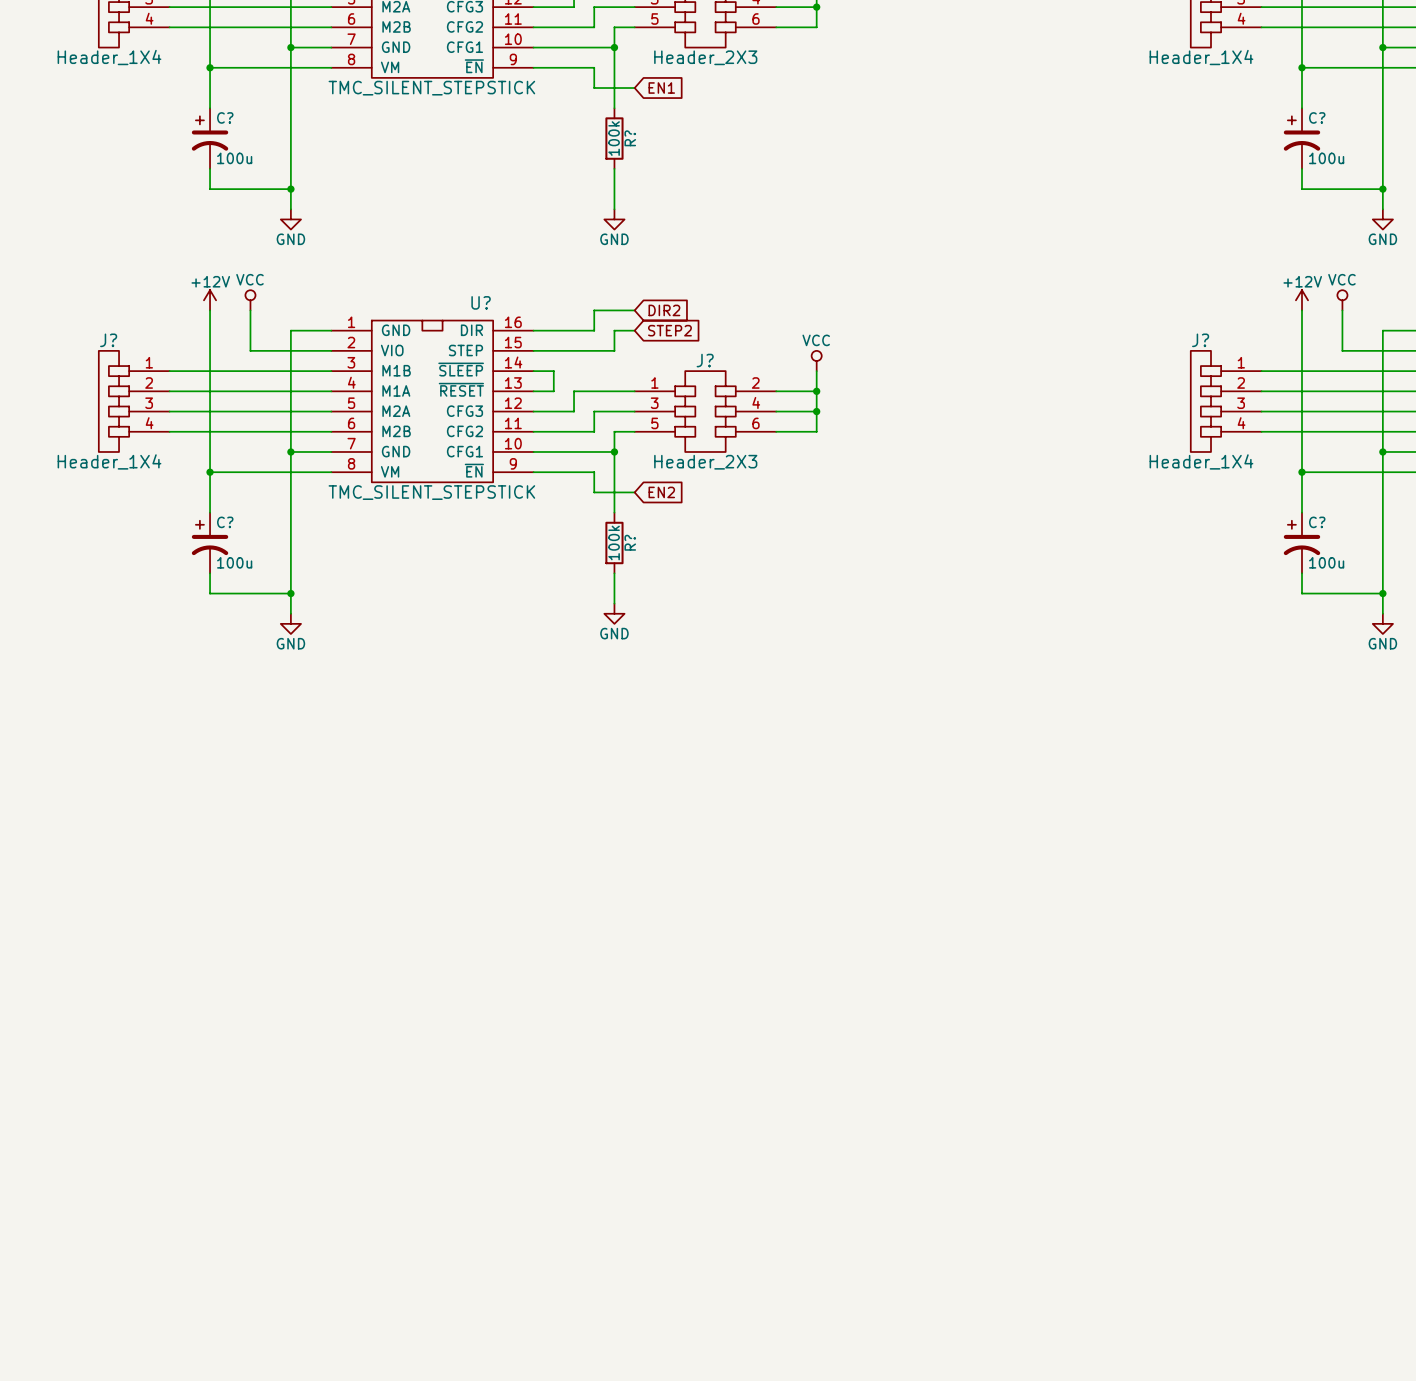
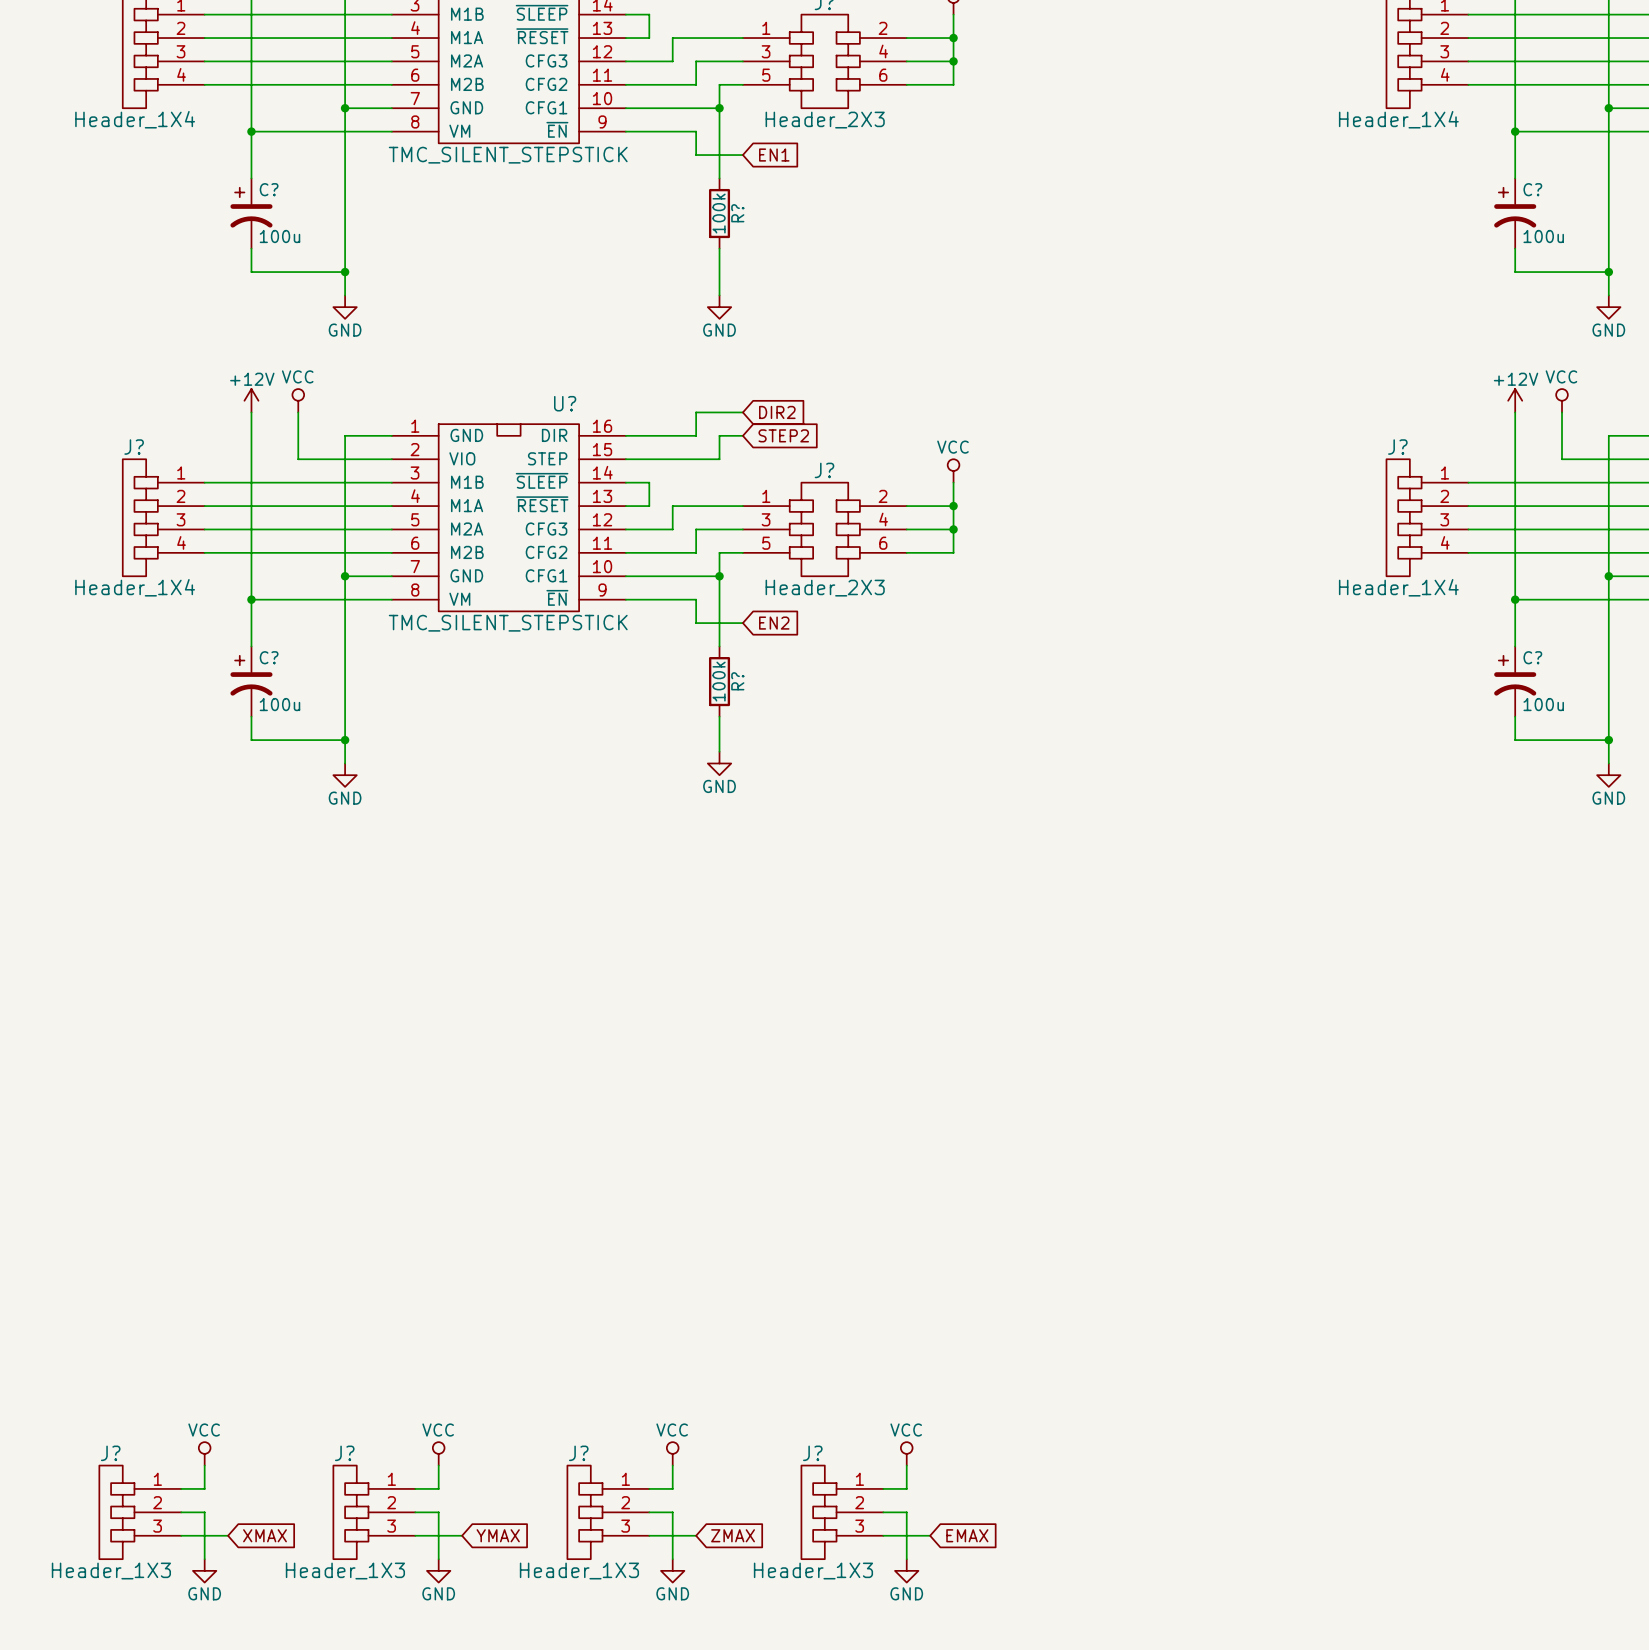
power symbol: none -> VCC (204, 1453)
power symbol: none -> VCC (438, 1453)
power symbol: none -> VCC (672, 1453)
power symbol: none -> VCC (906, 1453)
wire: none -> (204, 1465) (204, 1488) (181, 1488)
wire: none -> (438, 1465) (438, 1488) (415, 1488)
wire: none -> (672, 1465) (672, 1488) (649, 1488)
wire: none -> (906, 1465) (906, 1488) (883, 1488)
J?: none -> Header_1X3 (140, 1512)
wire: none -> (181, 1512) (204, 1512) (204, 1559)
J?: none -> Header_1X3 (374, 1512)
wire: none -> (415, 1512) (438, 1512) (438, 1559)
J?: none -> Header_1X3 (608, 1512)
wire: none -> (649, 1512) (672, 1512) (672, 1559)
J?: none -> Header_1X3 (842, 1512)
wire: none -> (883, 1512) (906, 1512) (906, 1559)
wire: none -> (181, 1535) (228, 1535)
global label: none -> XMAX (265, 1535)
wire: none -> (415, 1535) (462, 1535)
global label: none -> YMAX (498, 1535)
wire: none -> (649, 1535) (696, 1535)
global label: none -> ZMAX (733, 1535)
wire: none -> (883, 1535) (930, 1535)
global label: none -> EMAX (967, 1535)
power symbol: none -> GND (204, 1570)
power symbol: none -> GND (438, 1570)
power symbol: none -> GND (672, 1570)
power symbol: none -> GND (906, 1570)

